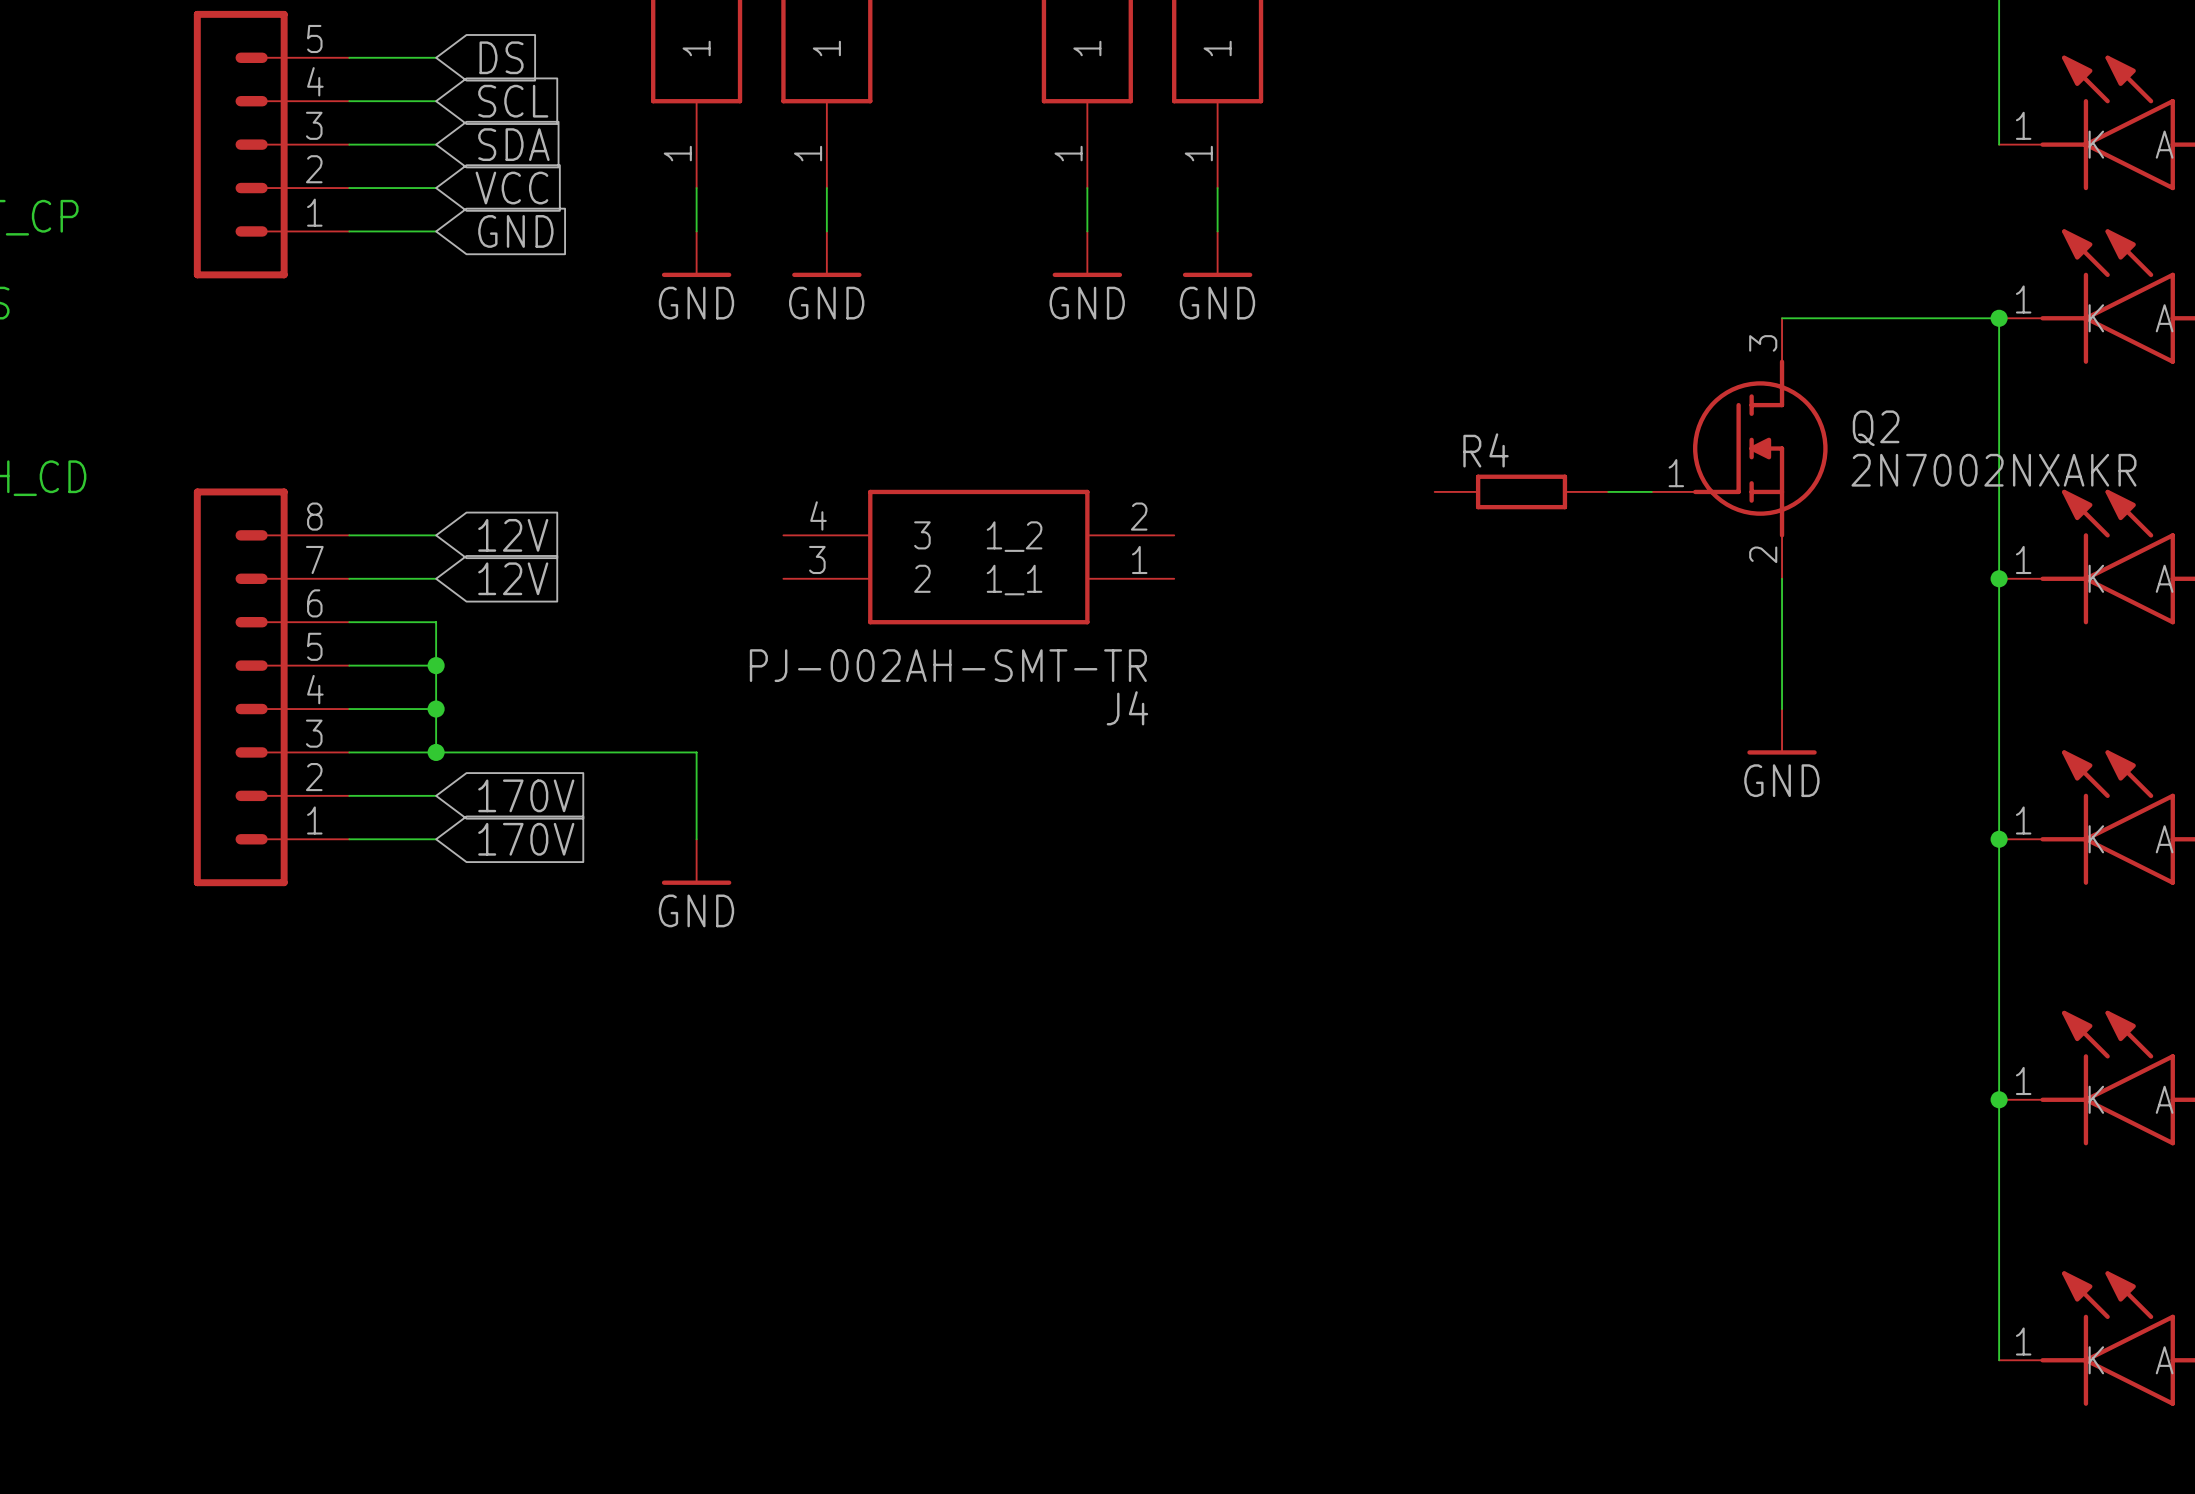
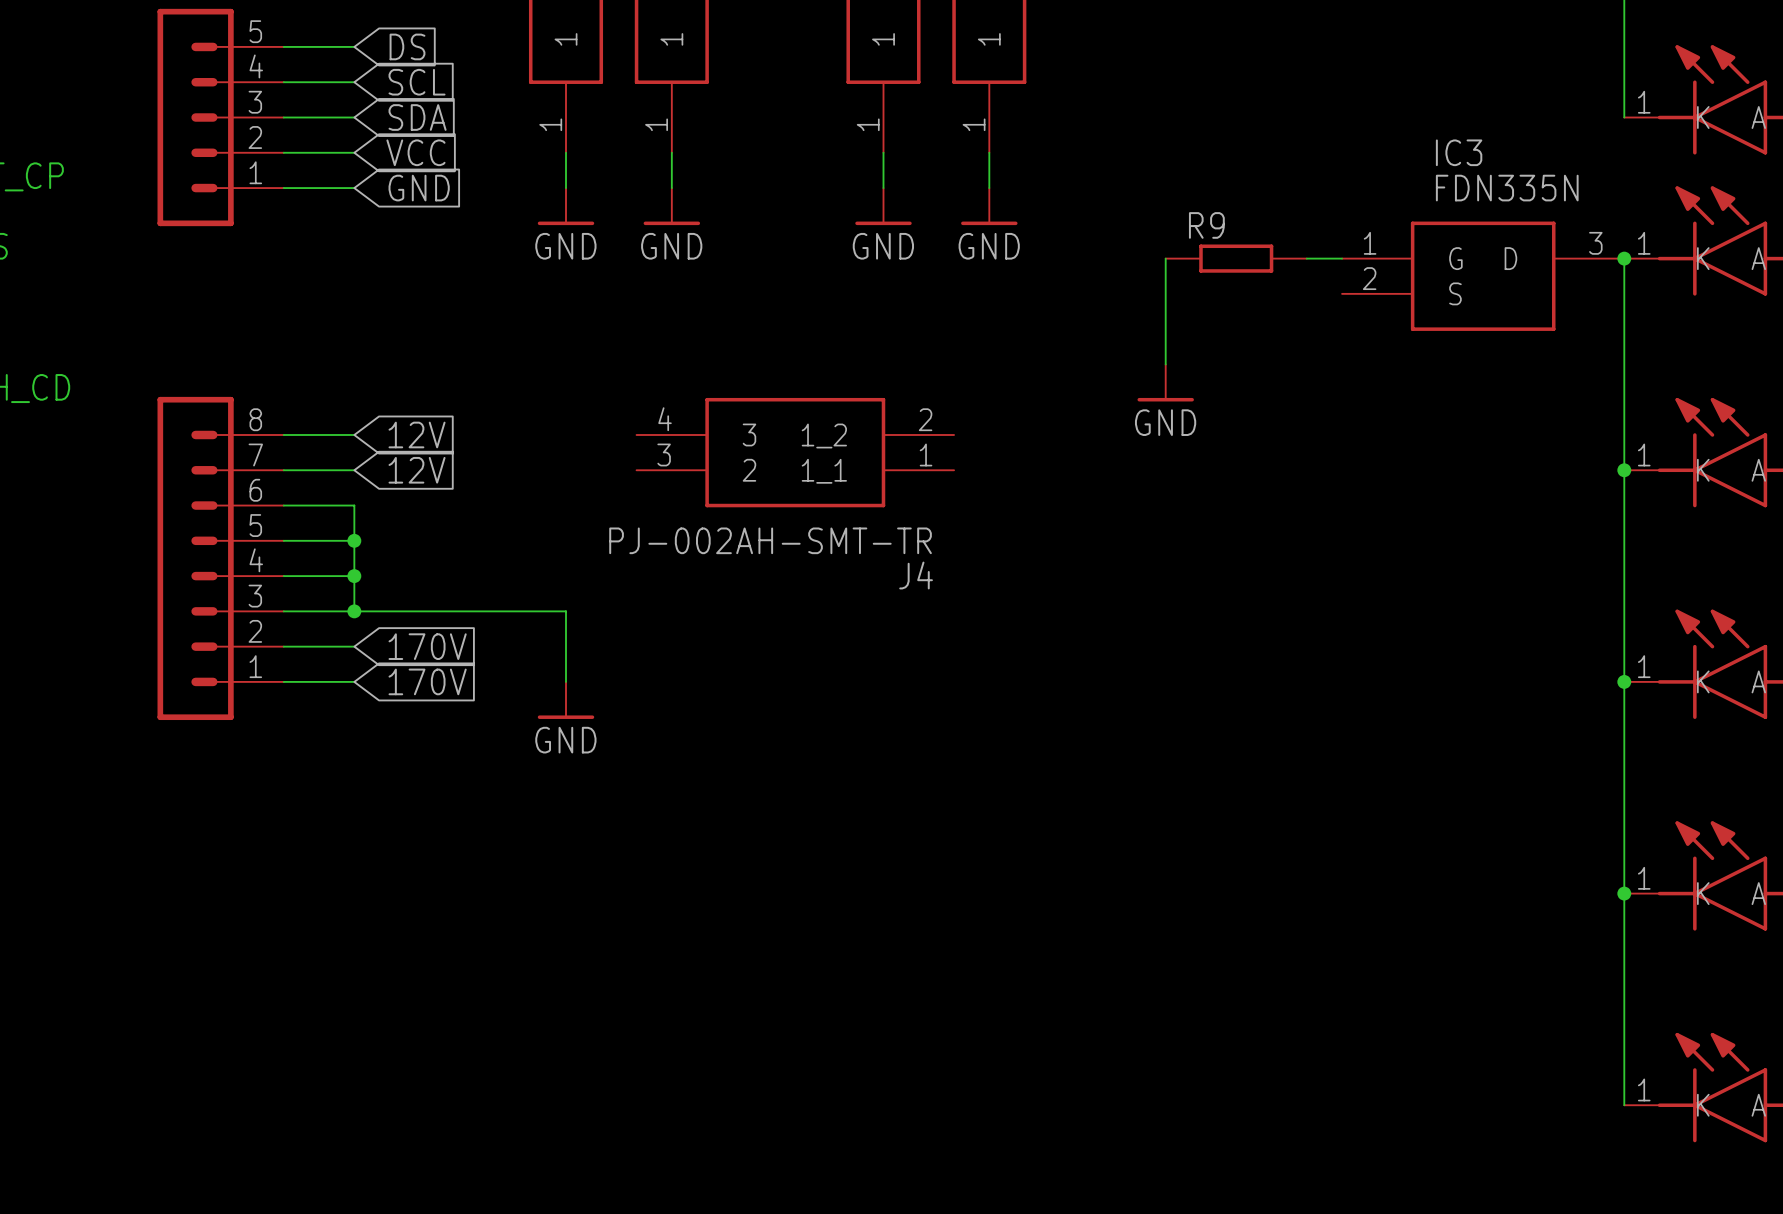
wire: none -> (1165, 258) (1165, 364)
R9: none -> (1236, 258)
wire: (1782, 318) (1999, 318) -> none
IC3: none -> FDN335N (1483, 276)
Q2: 2N7002NXAKR (1739, 448) -> none
power symbol: none -> GND (1165, 382)
R4: (1521, 491) -> none
wire: (1608, 491) (1651, 491) -> (1306, 258) (1342, 258)
wire: (1782, 578) (1782, 709) -> none
power symbol: GND (1782, 731) -> none

